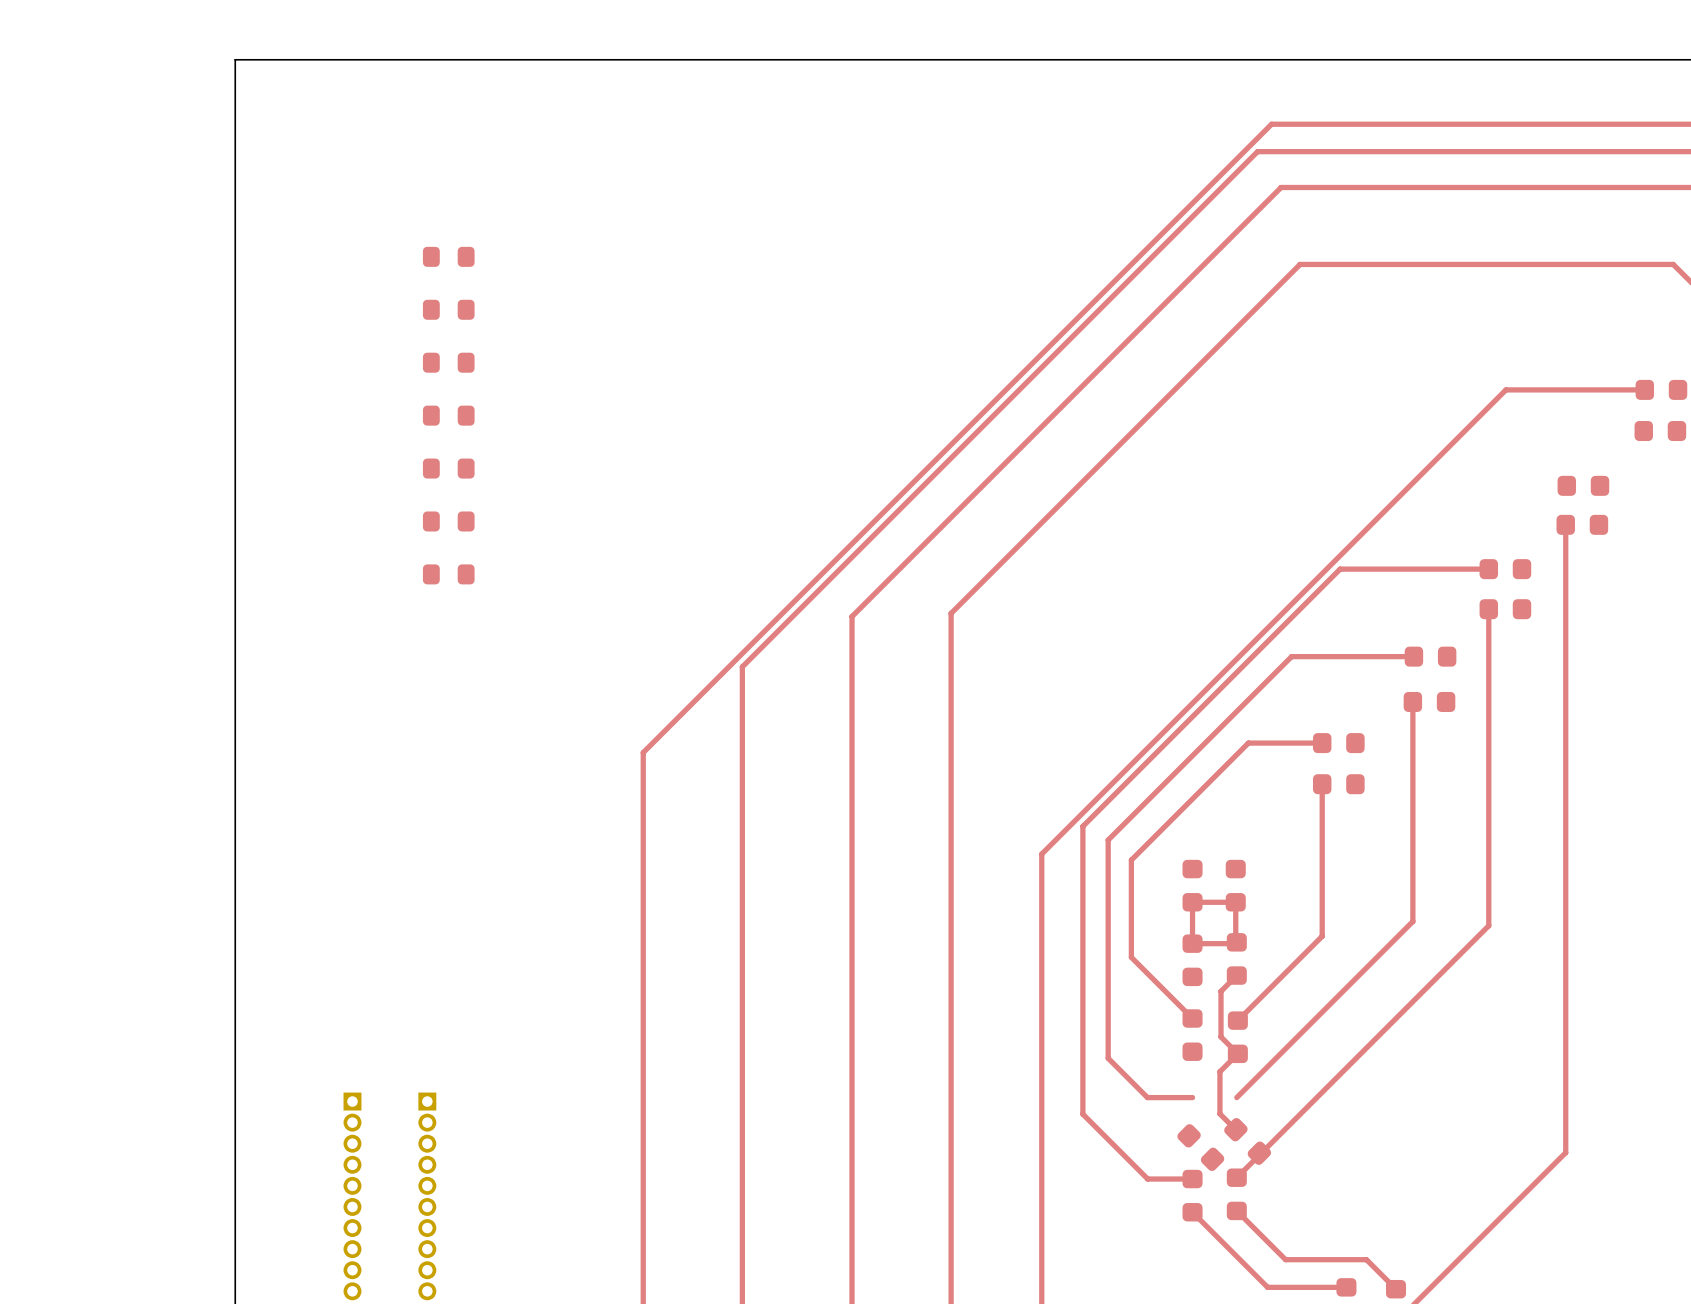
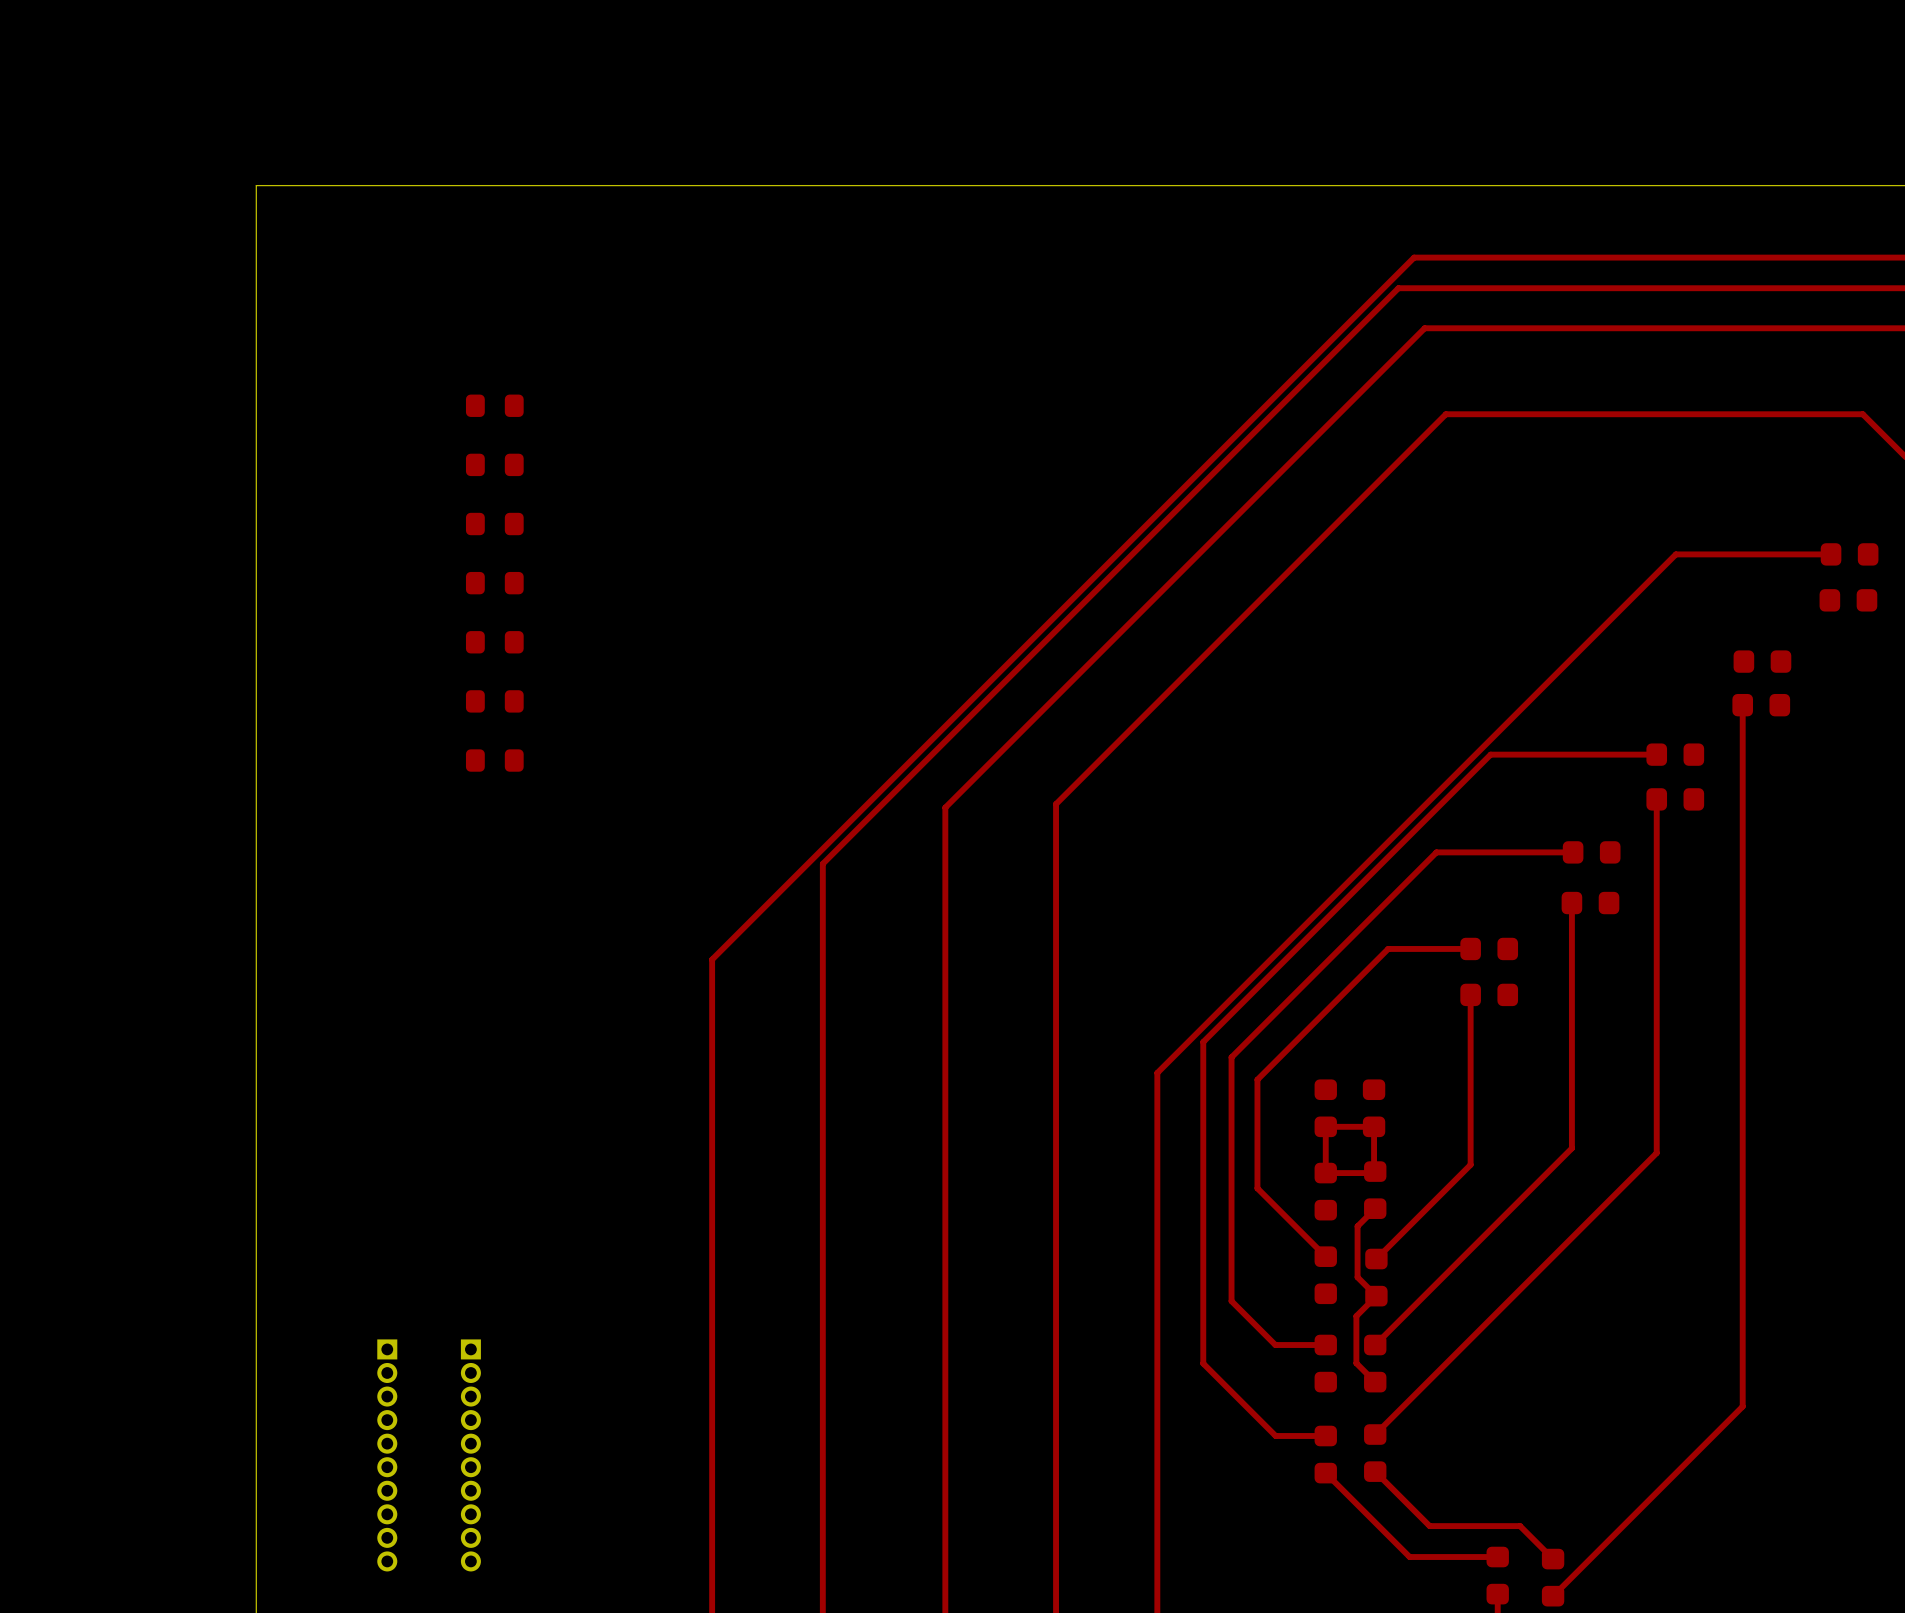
part: none -> (1325, 1363)
part: none -> (1375, 1363)
part: (1247, 1141) -> none
part: (1200, 1147) -> none

